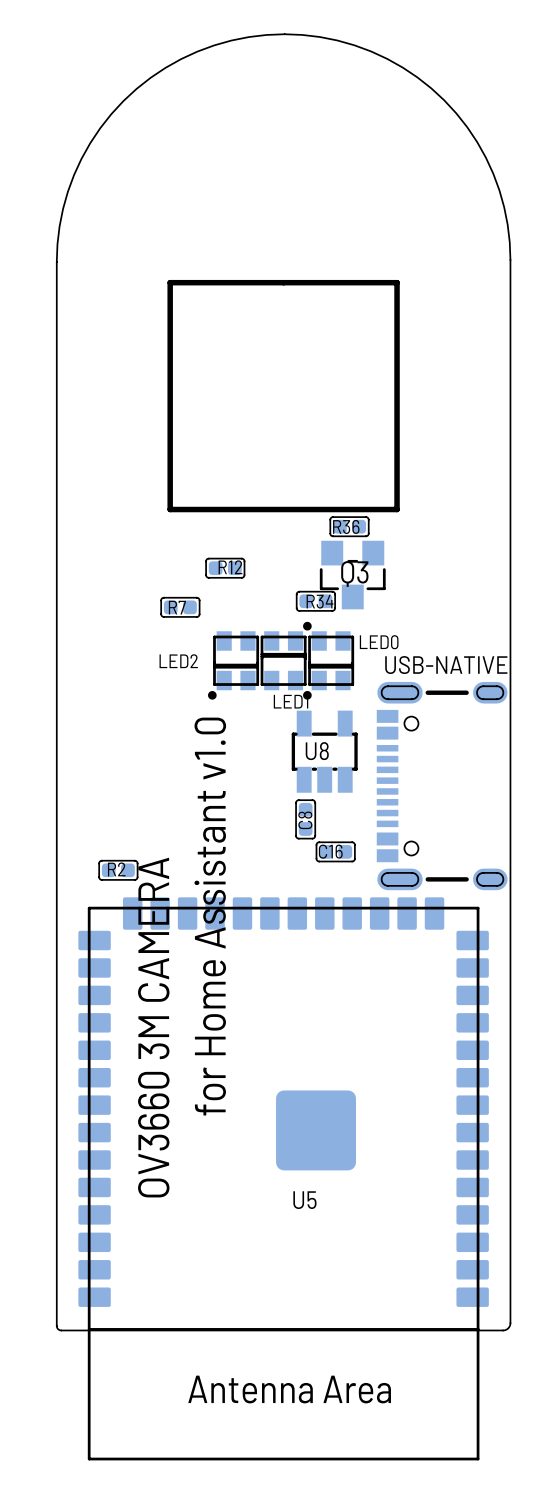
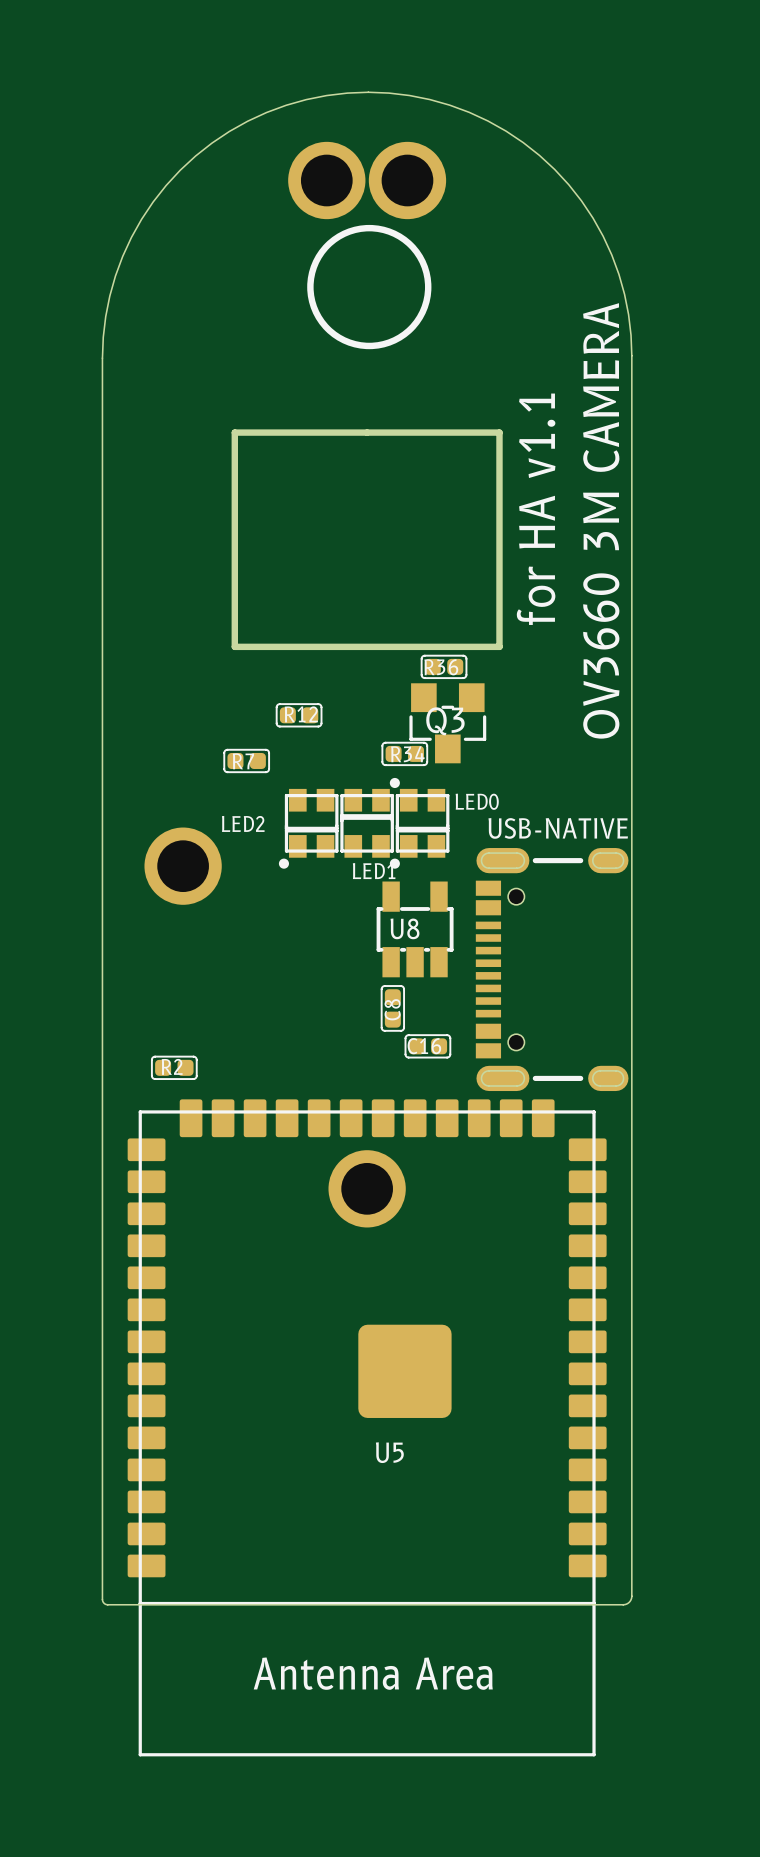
part: none -> (326, 180)
part: none -> (407, 180)
drawing: none -> [307, 224, 432, 350]
board edge: (397, 325) (397, 282) (170, 282) (170, 325) -> (499, 432) (234, 432)
text: none -> for HA v1.1 (536, 509)
text: none -> OV3660 3M CAMERA (601, 520)
part: none -> (183, 866)
text: for Home Assistant v1.0 (210, 916) -> none
part: none -> (367, 1188)
text: OV3660 3M CAMERA (153, 1027) -> none

